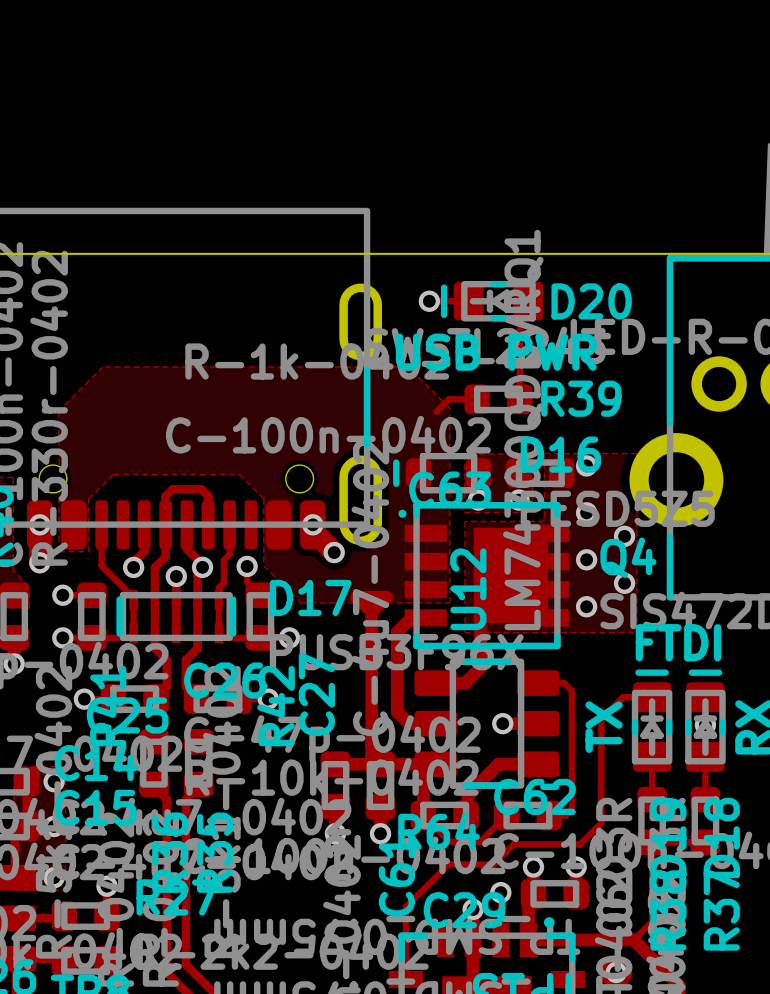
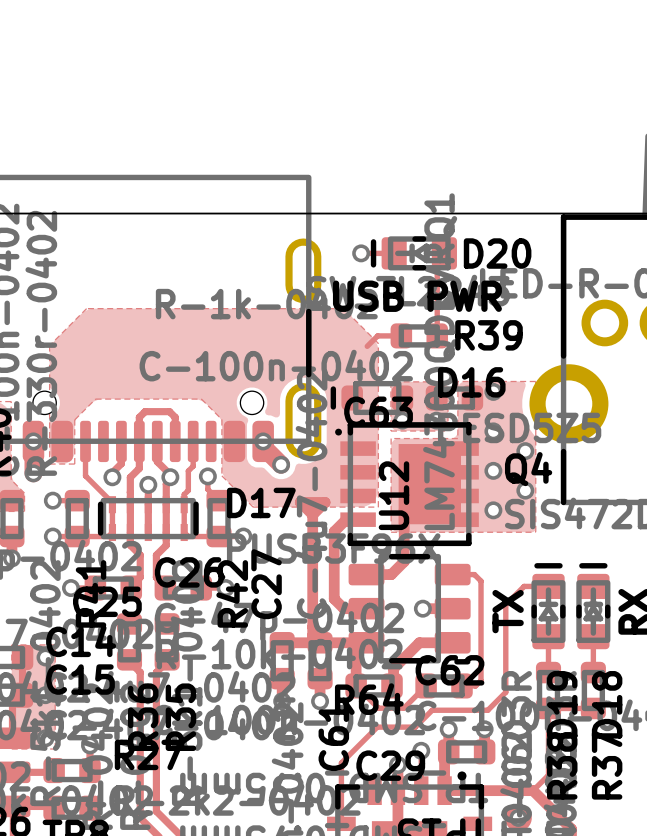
text: FTDI (678, 642) -> none

